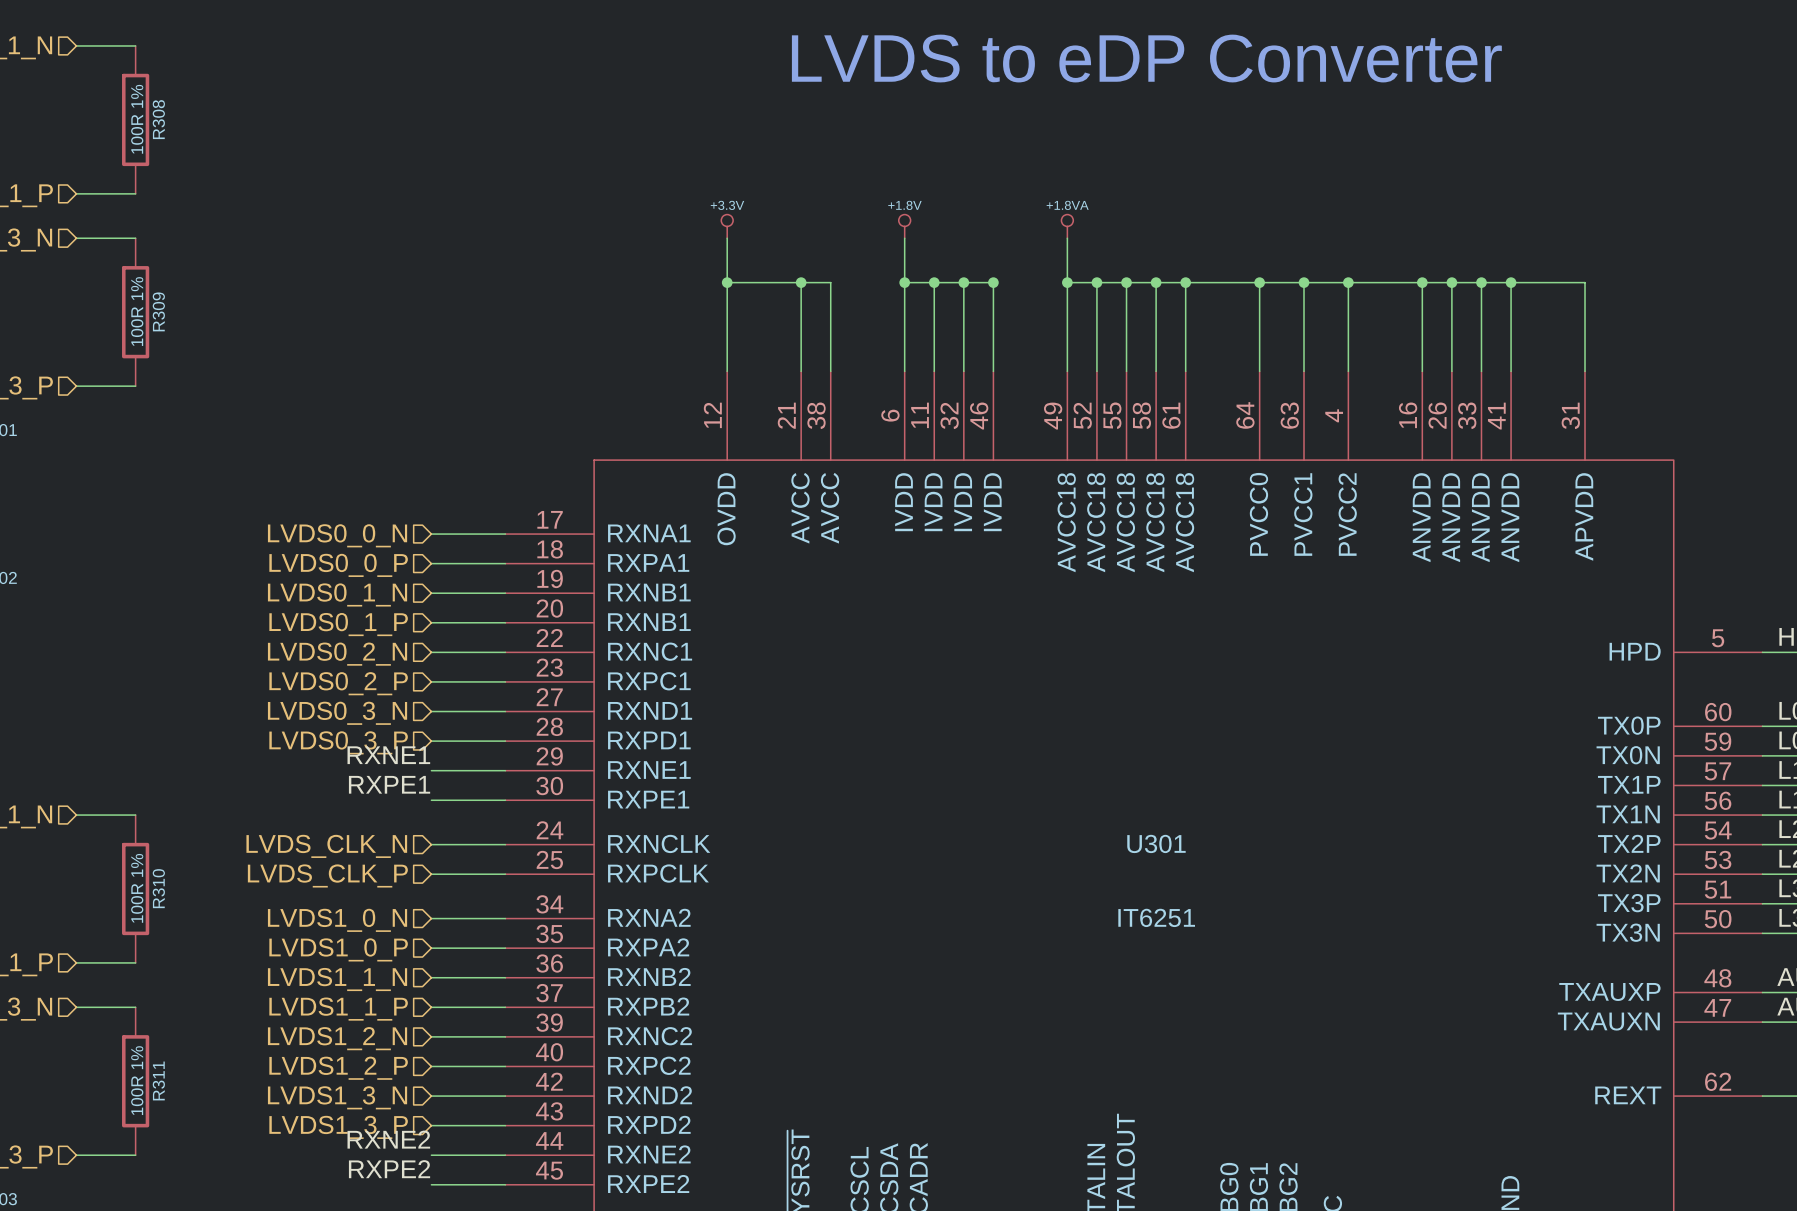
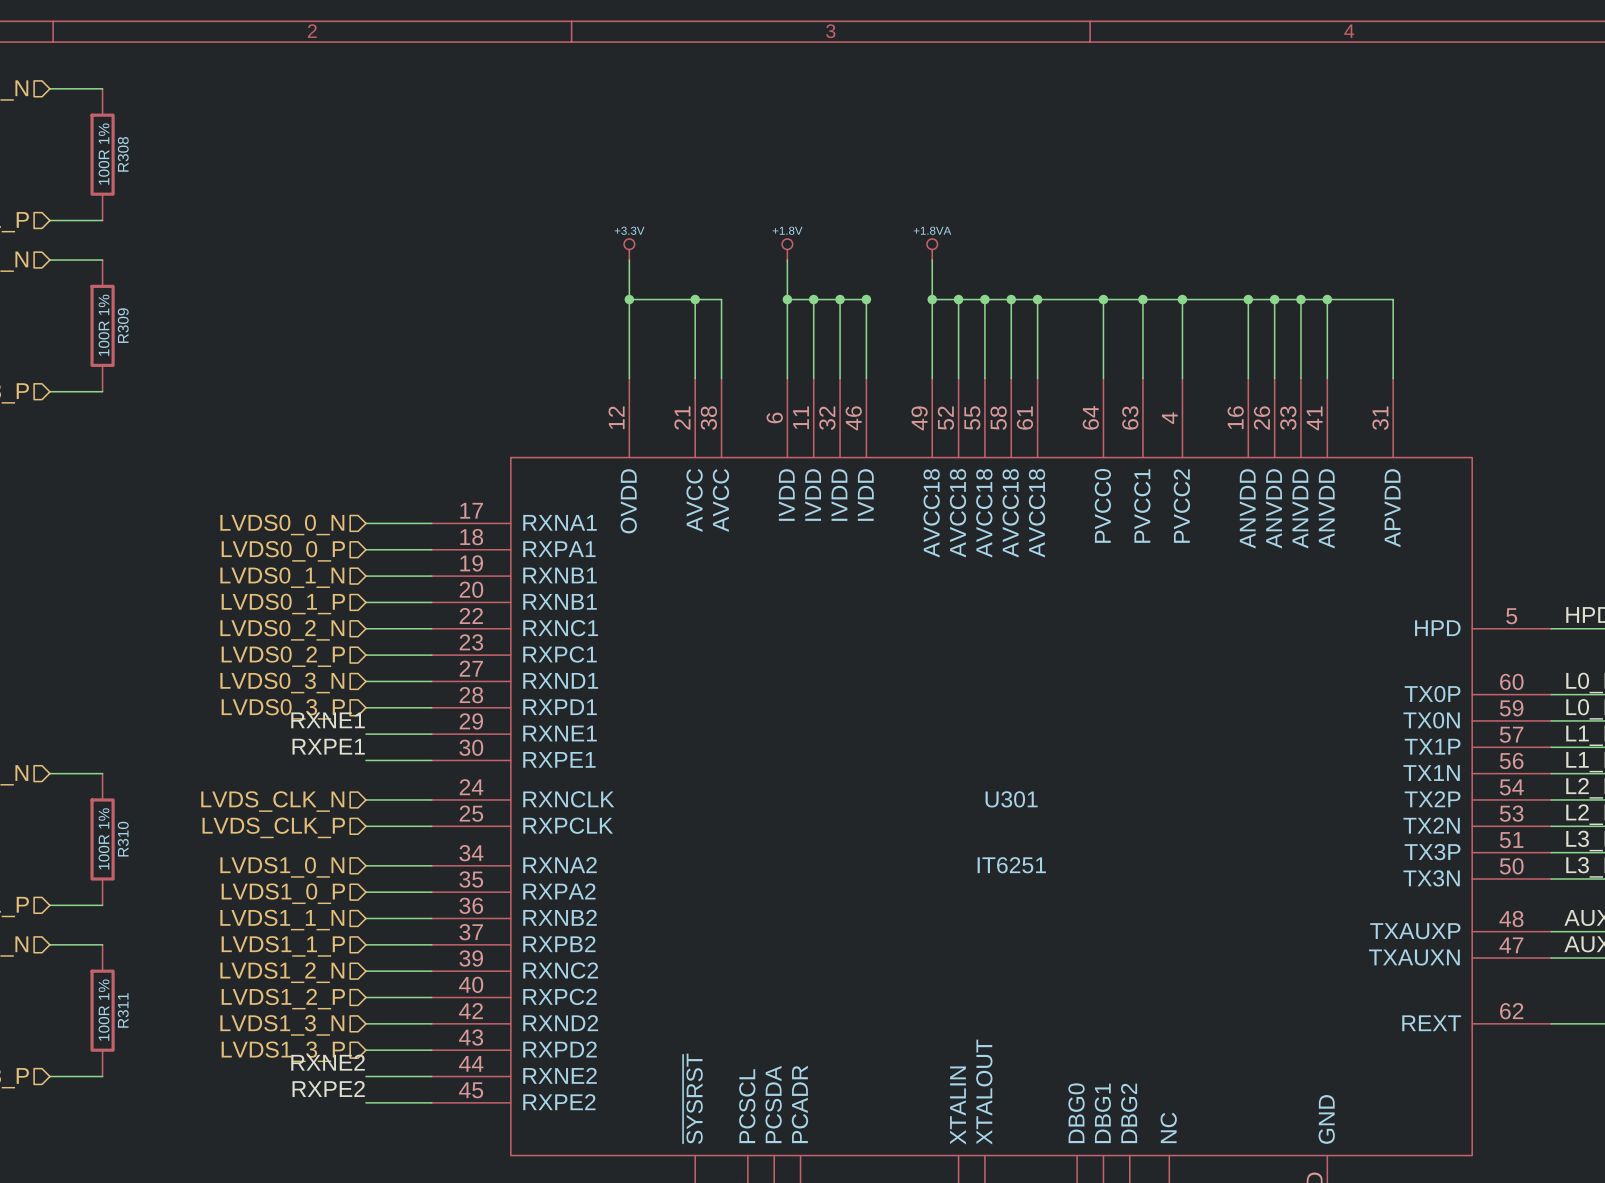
text: LVDS to eDP Converter (1146, 58) -> none

